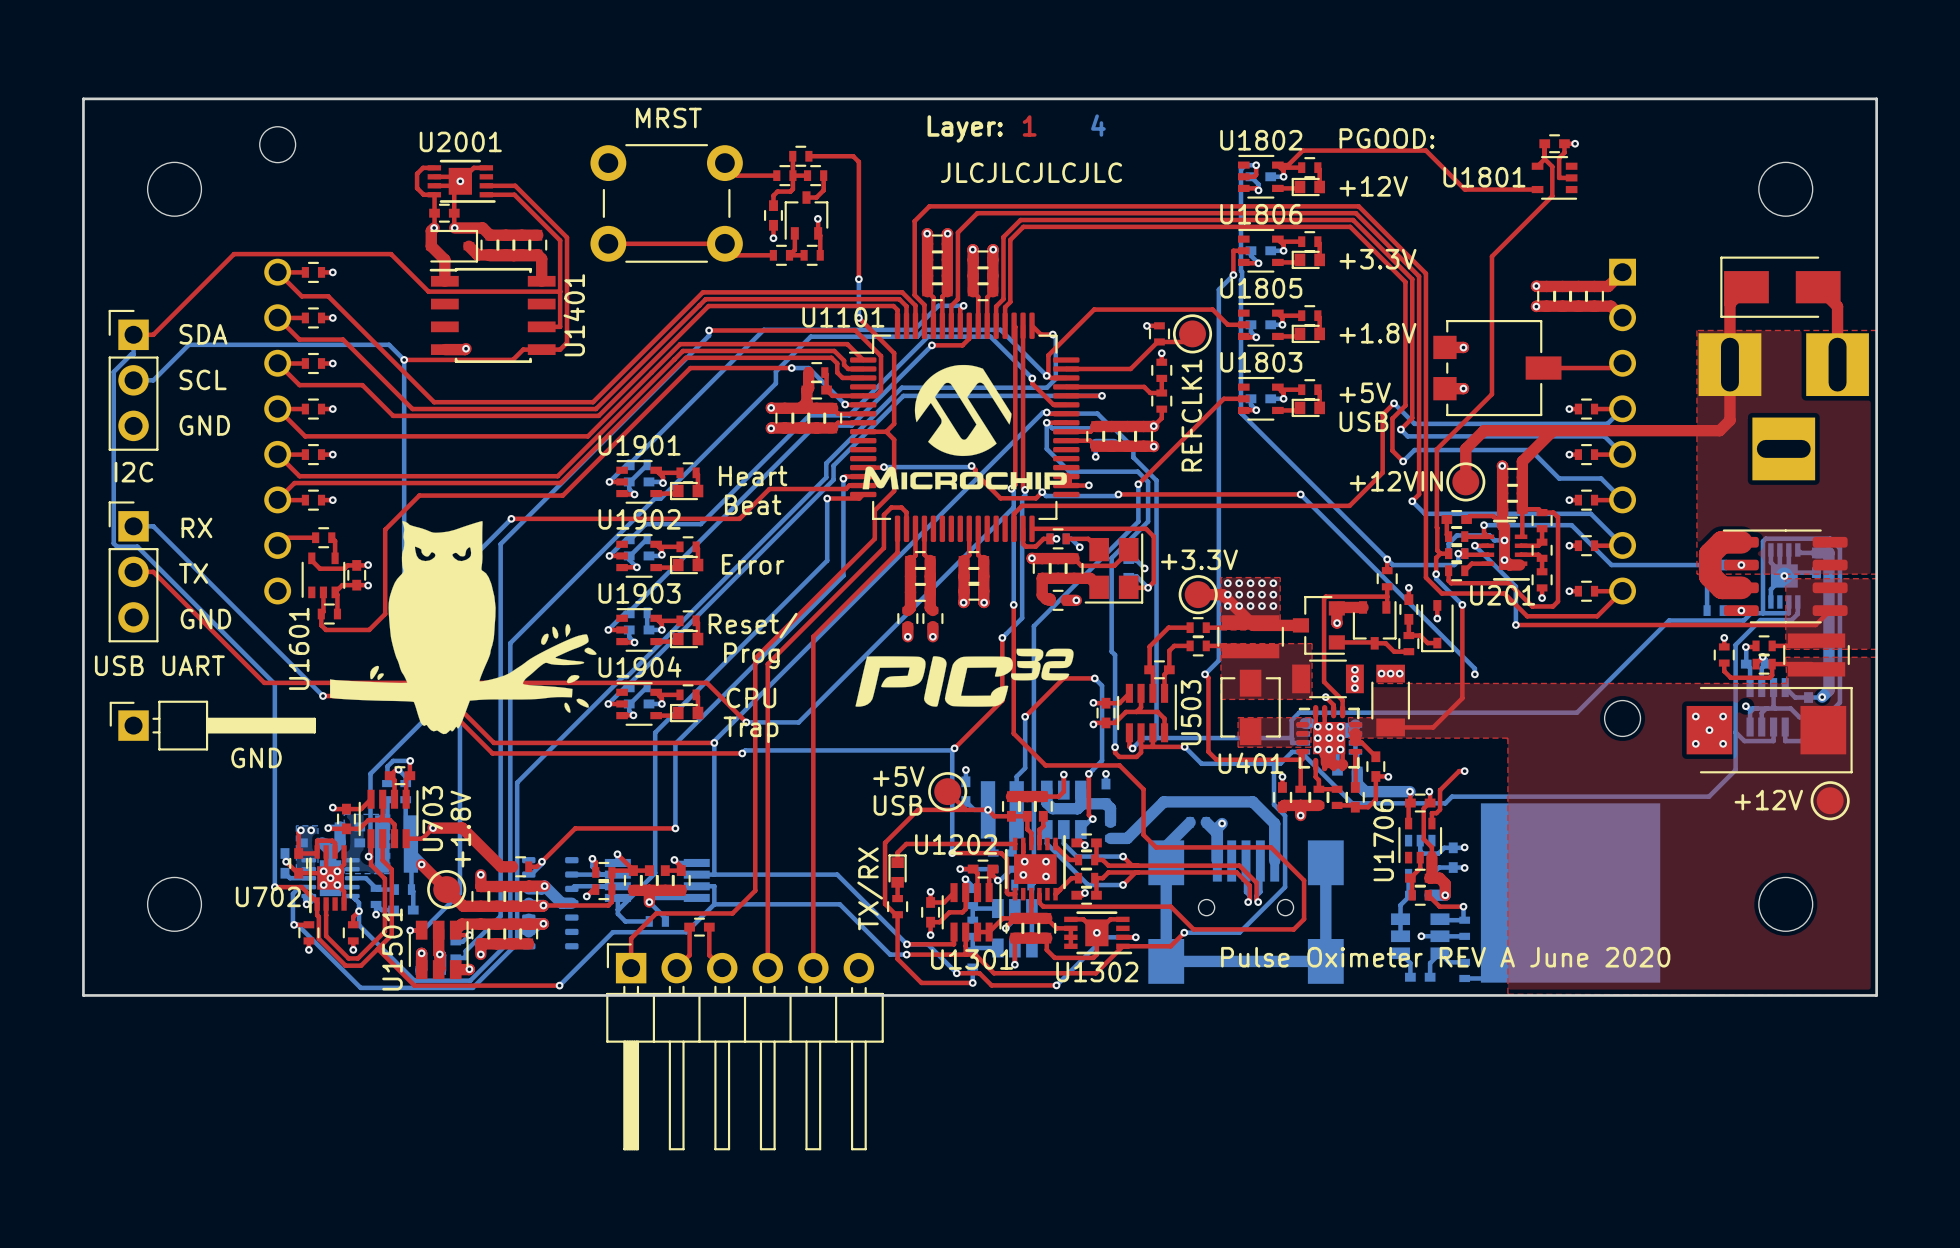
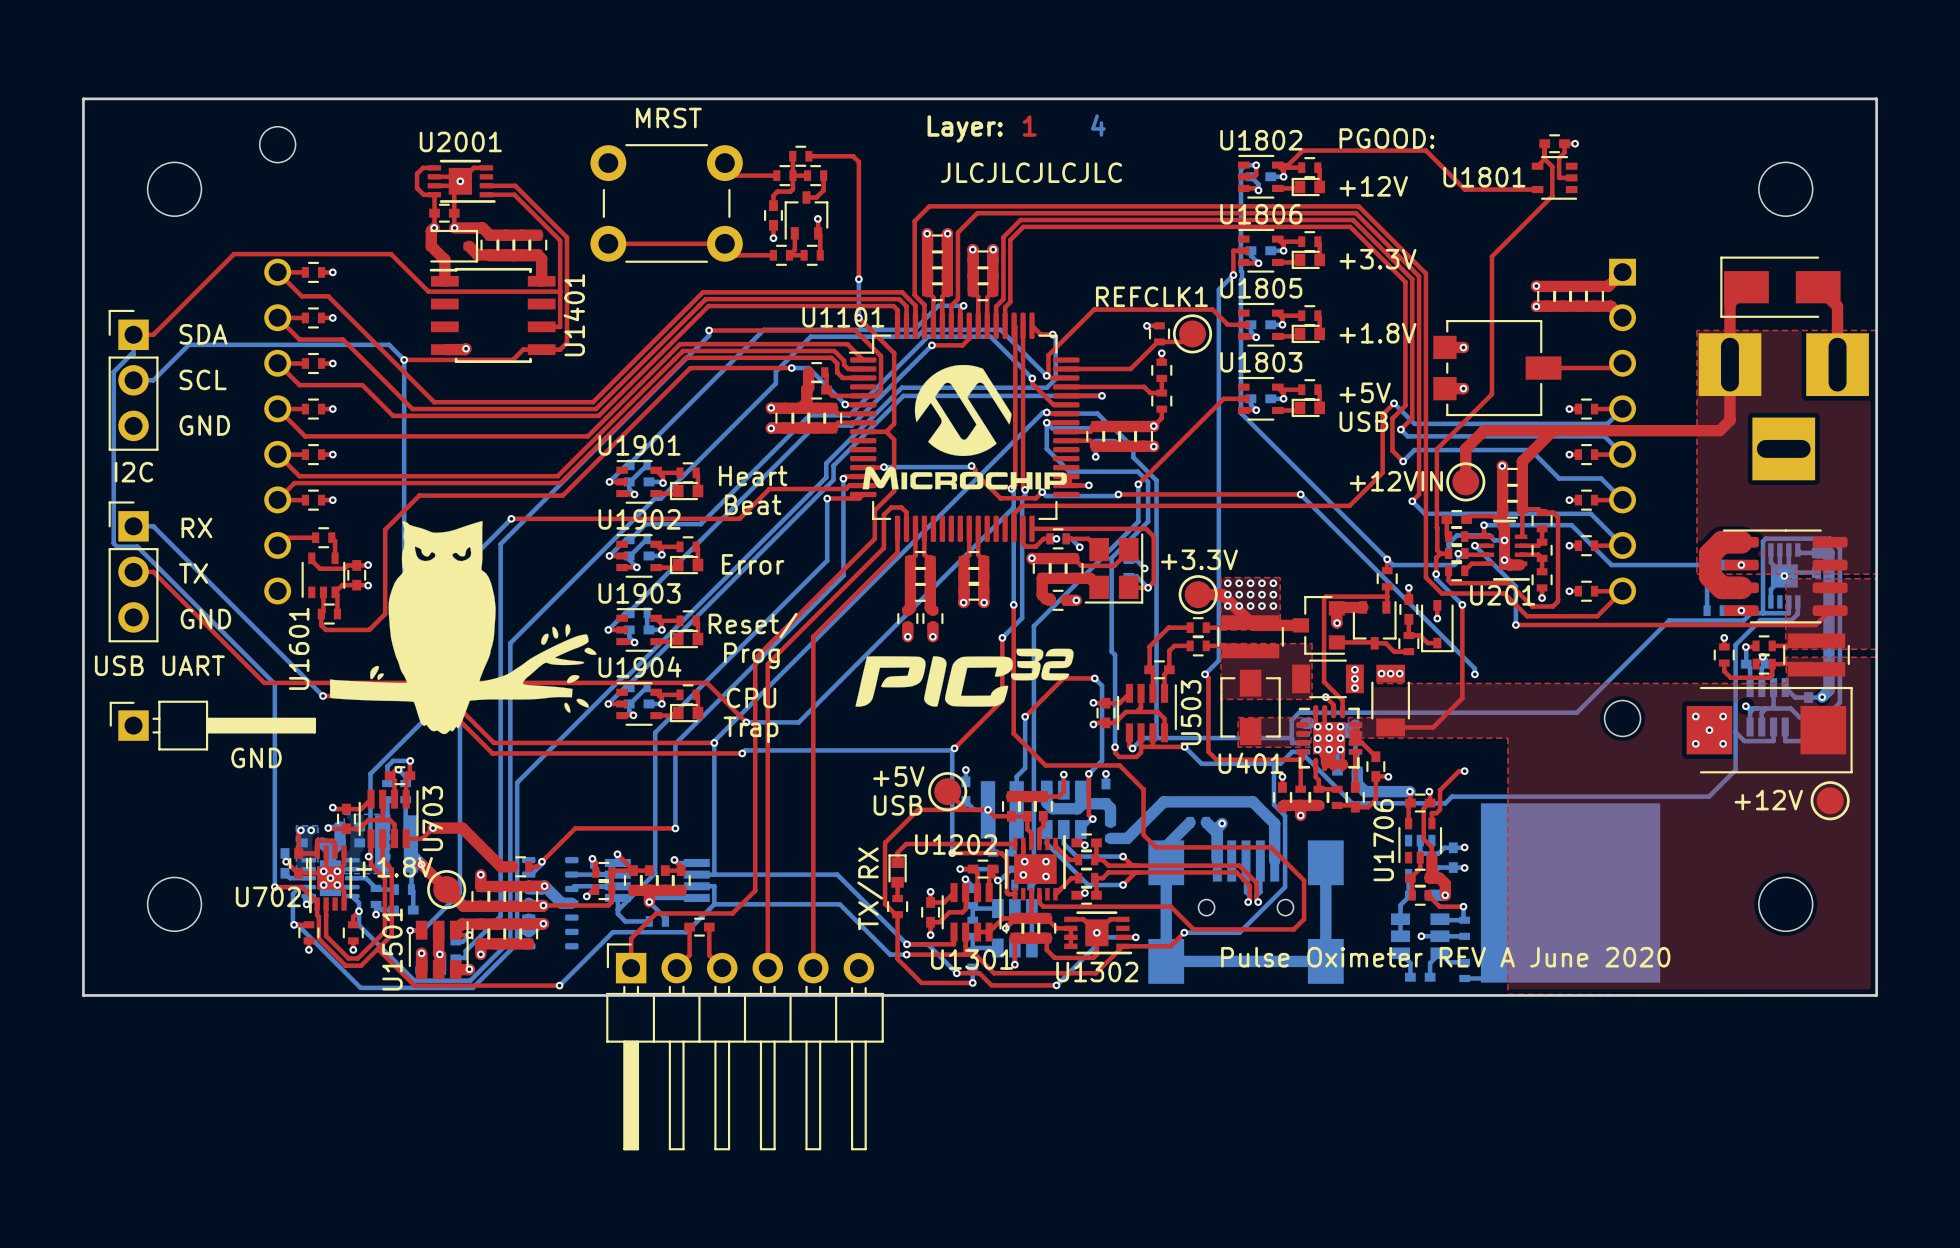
text rotation: 0° (1191, 415) -> 90° clockwise (1151, 296)
text rotation: 0° (460, 829) -> 90° clockwise (394, 867)

